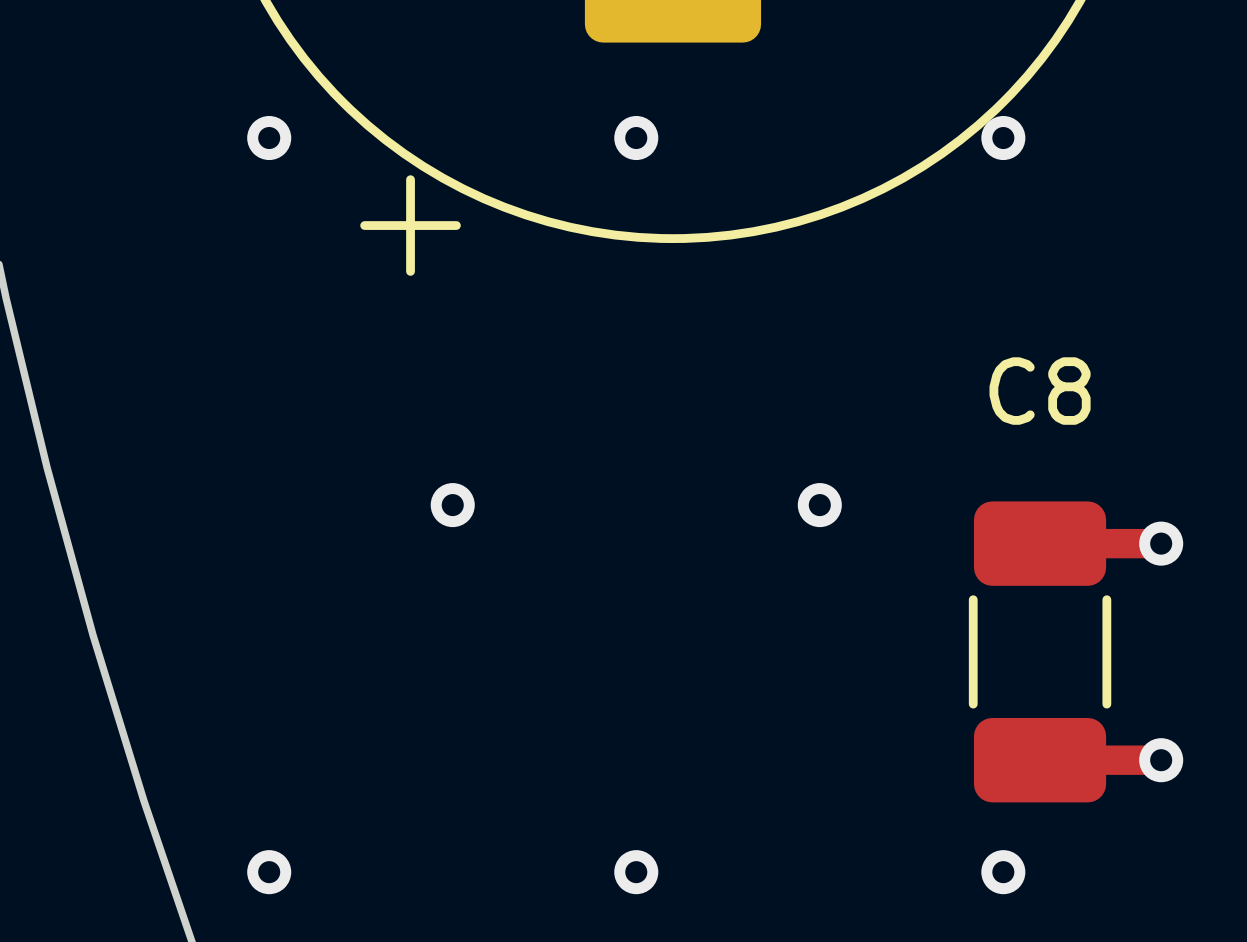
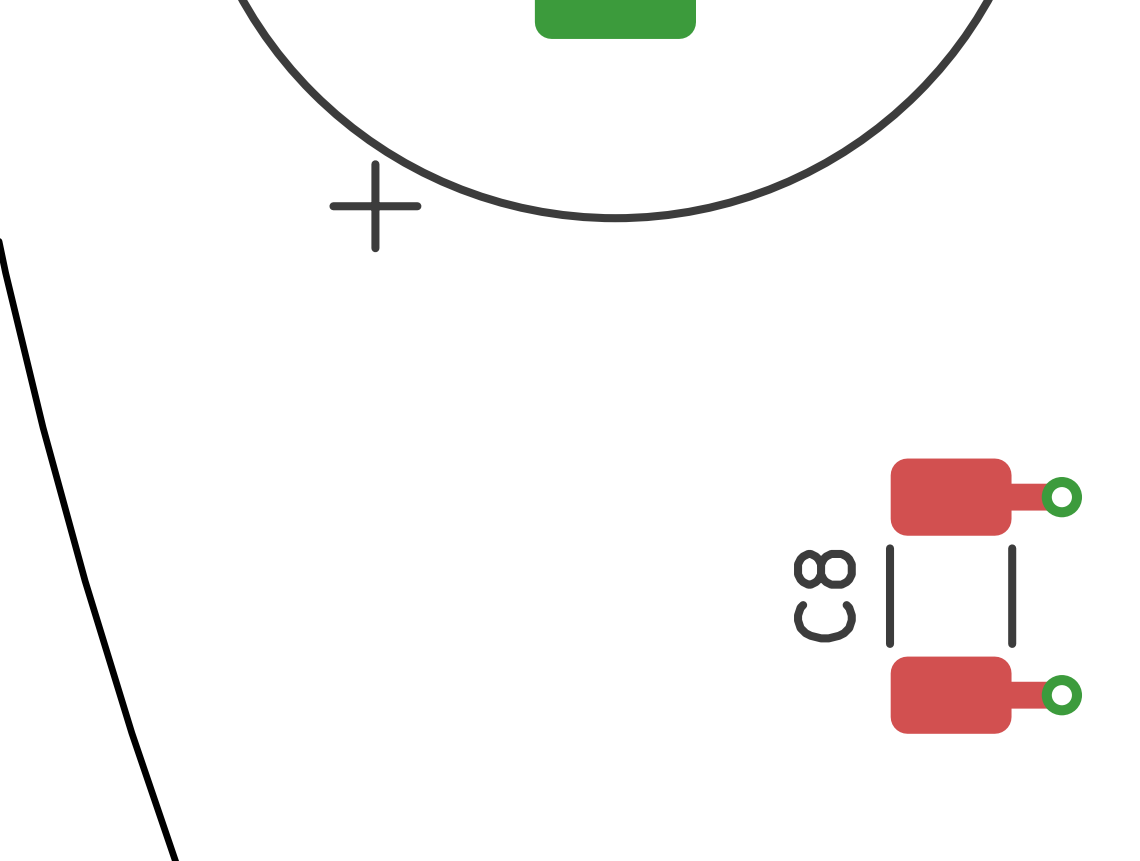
via: (269, 138) -> none
via: (636, 138) -> none
via: (1003, 138) -> none
C8 name rotation: 0° (1040, 391) -> 90° counterclockwise (824, 596)
C8 name position: C8 (1040, 391) -> C8 (824, 596)
via: (452, 505) -> none
via: (819, 505) -> none
via: (269, 872) -> none
via: (636, 872) -> none
via: (1003, 872) -> none

